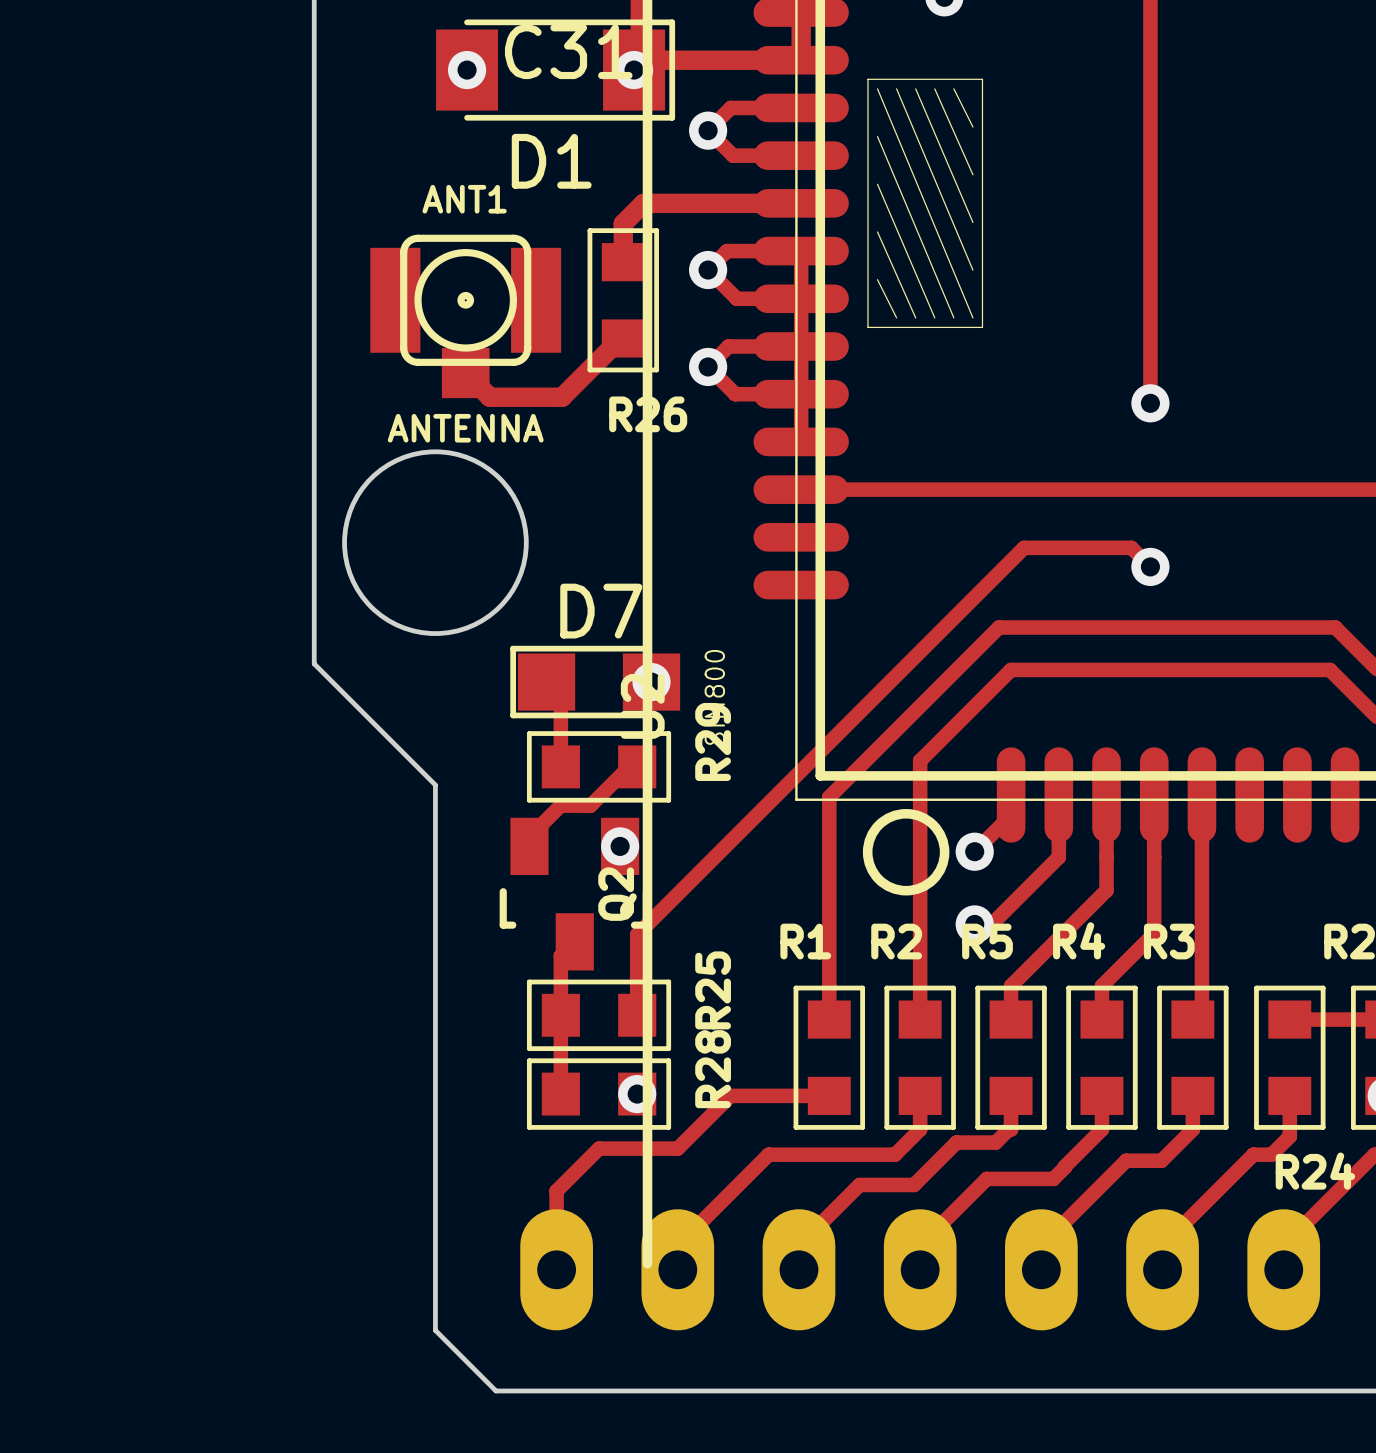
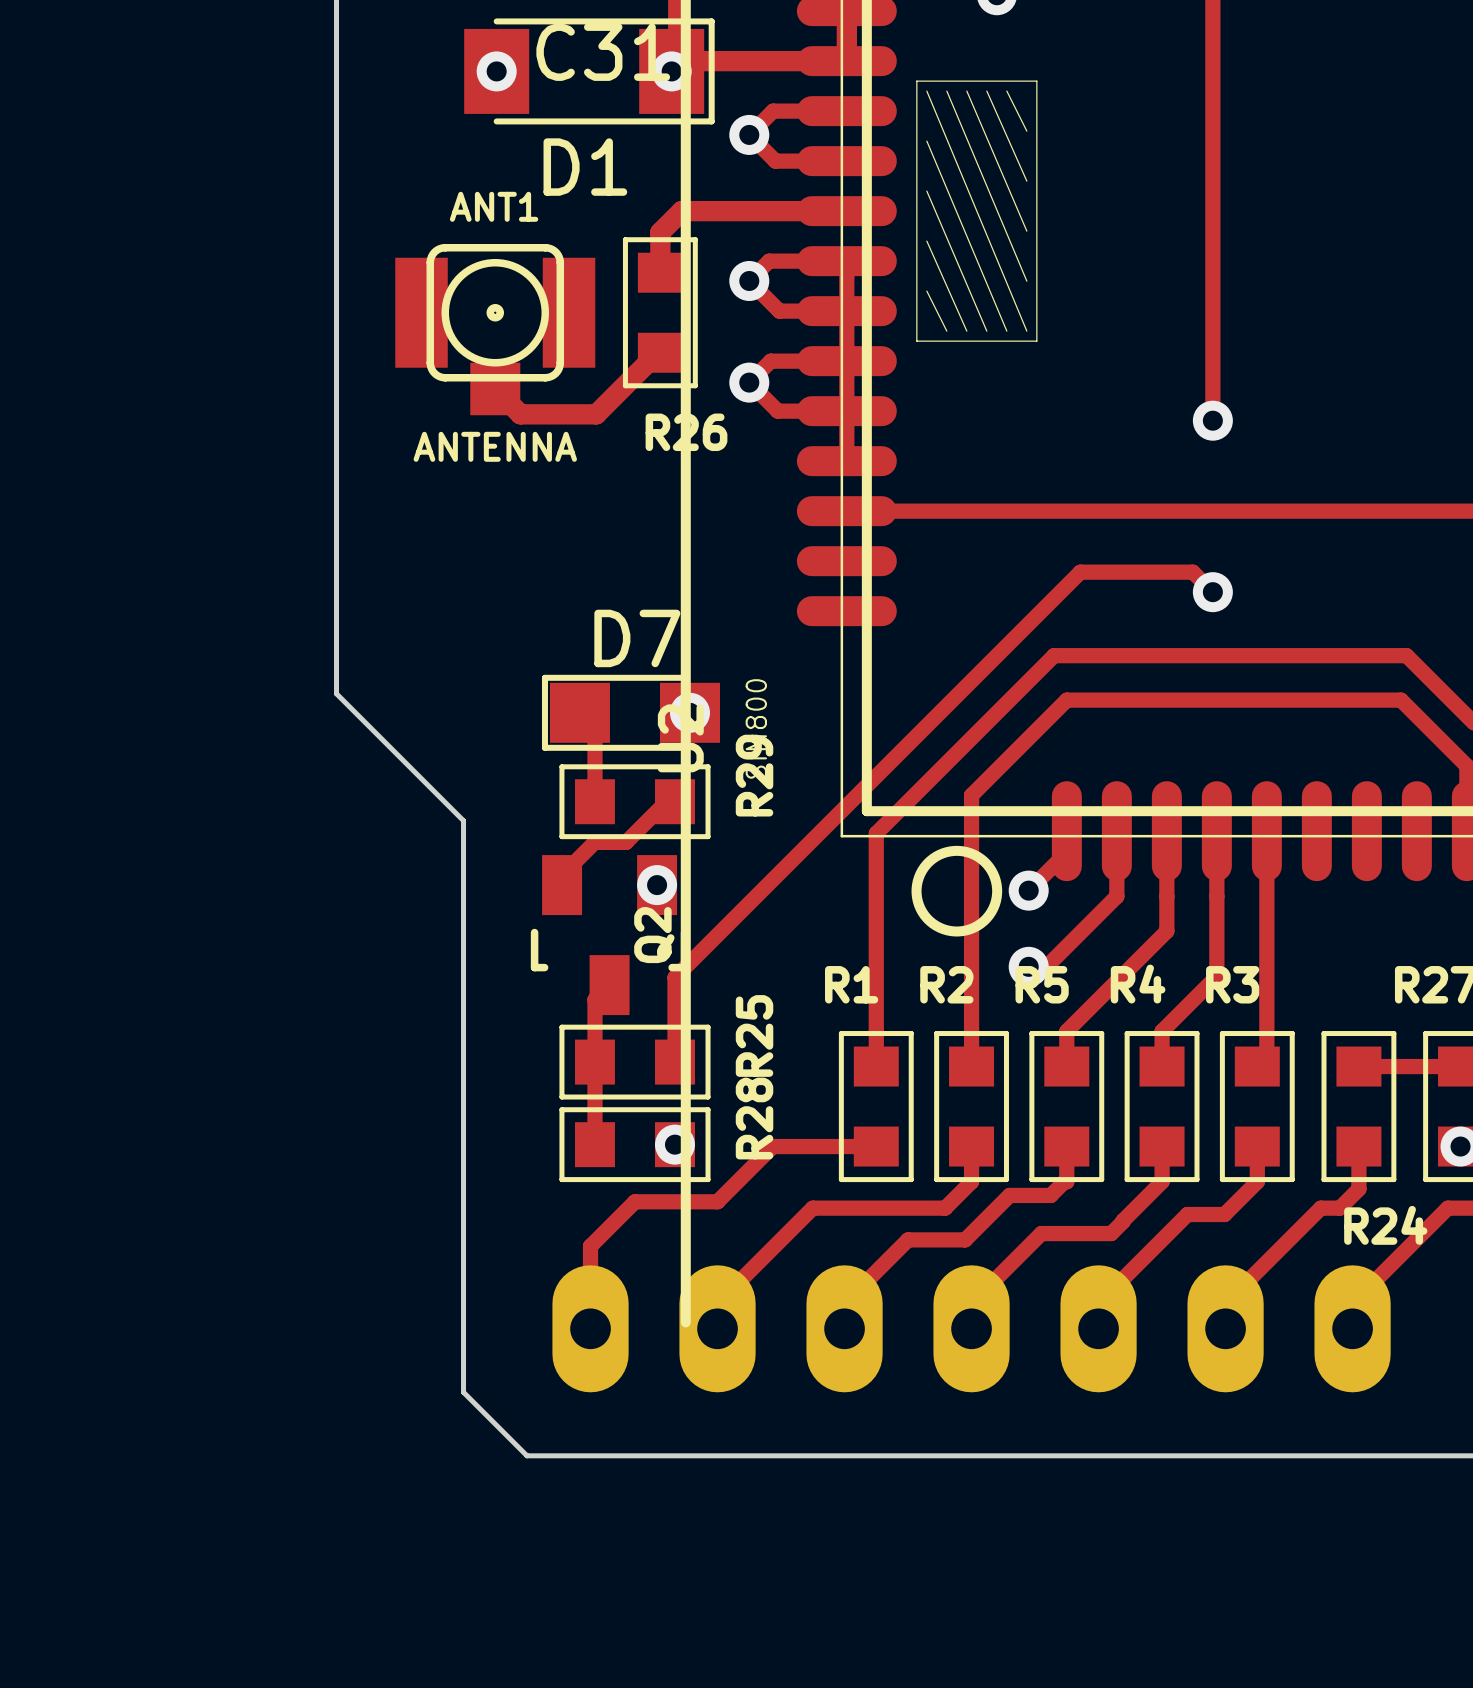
round board edge: [342, 449, 529, 636] -> none

